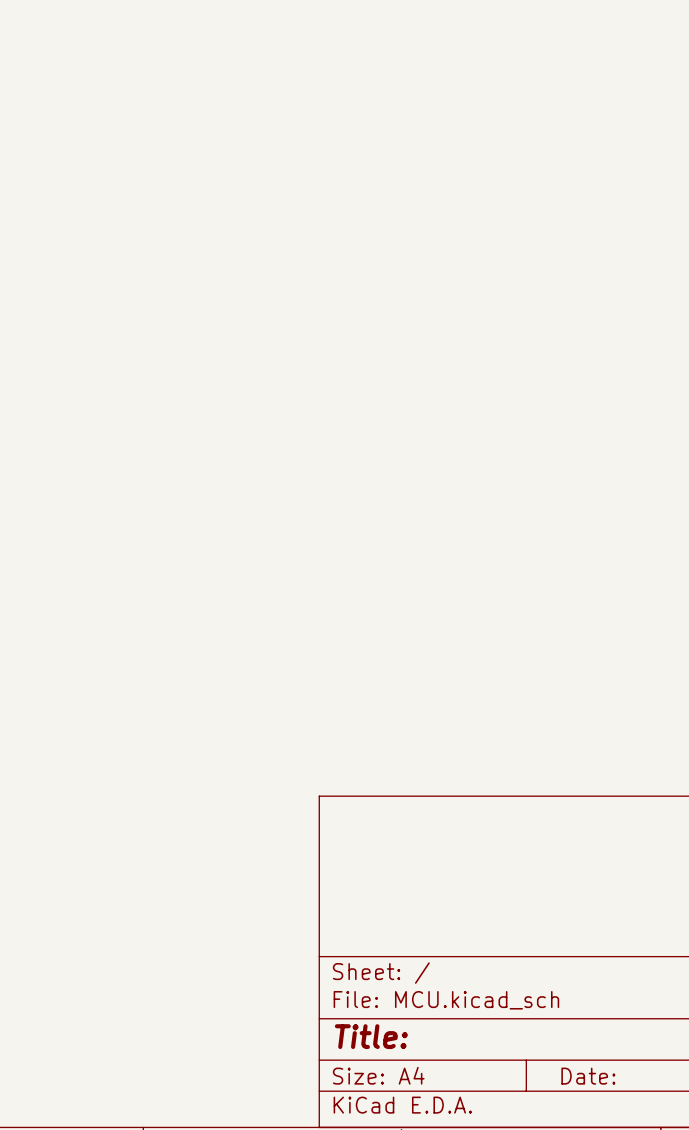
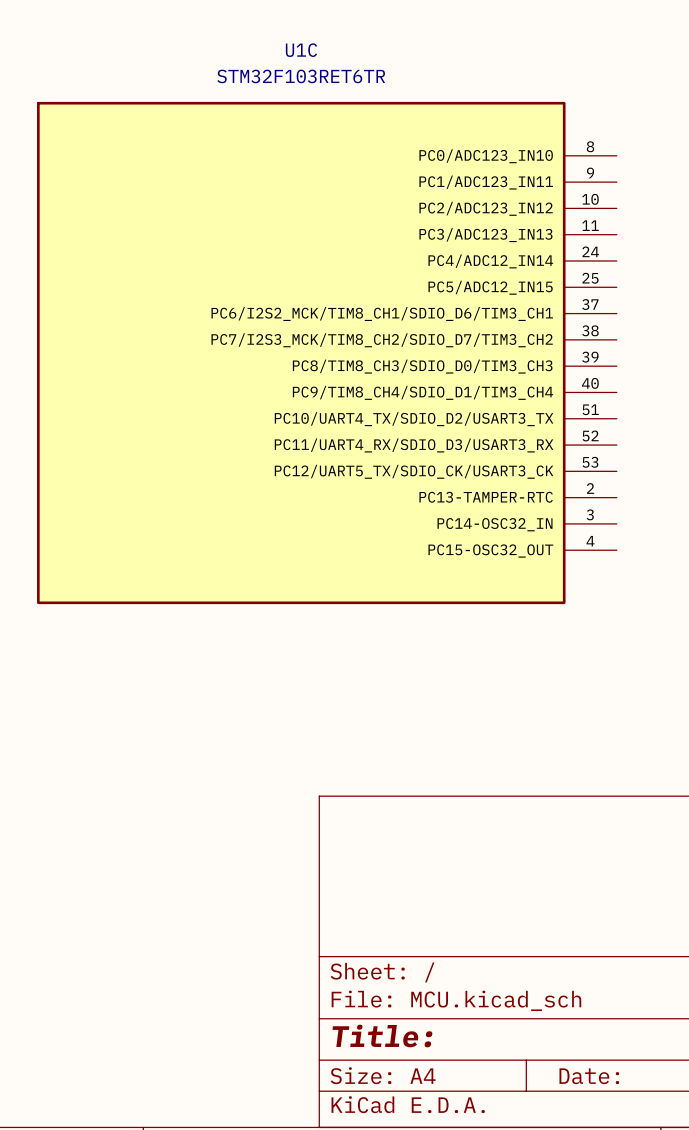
U1C: none -> STM32F103RET6TR (326, 353)

